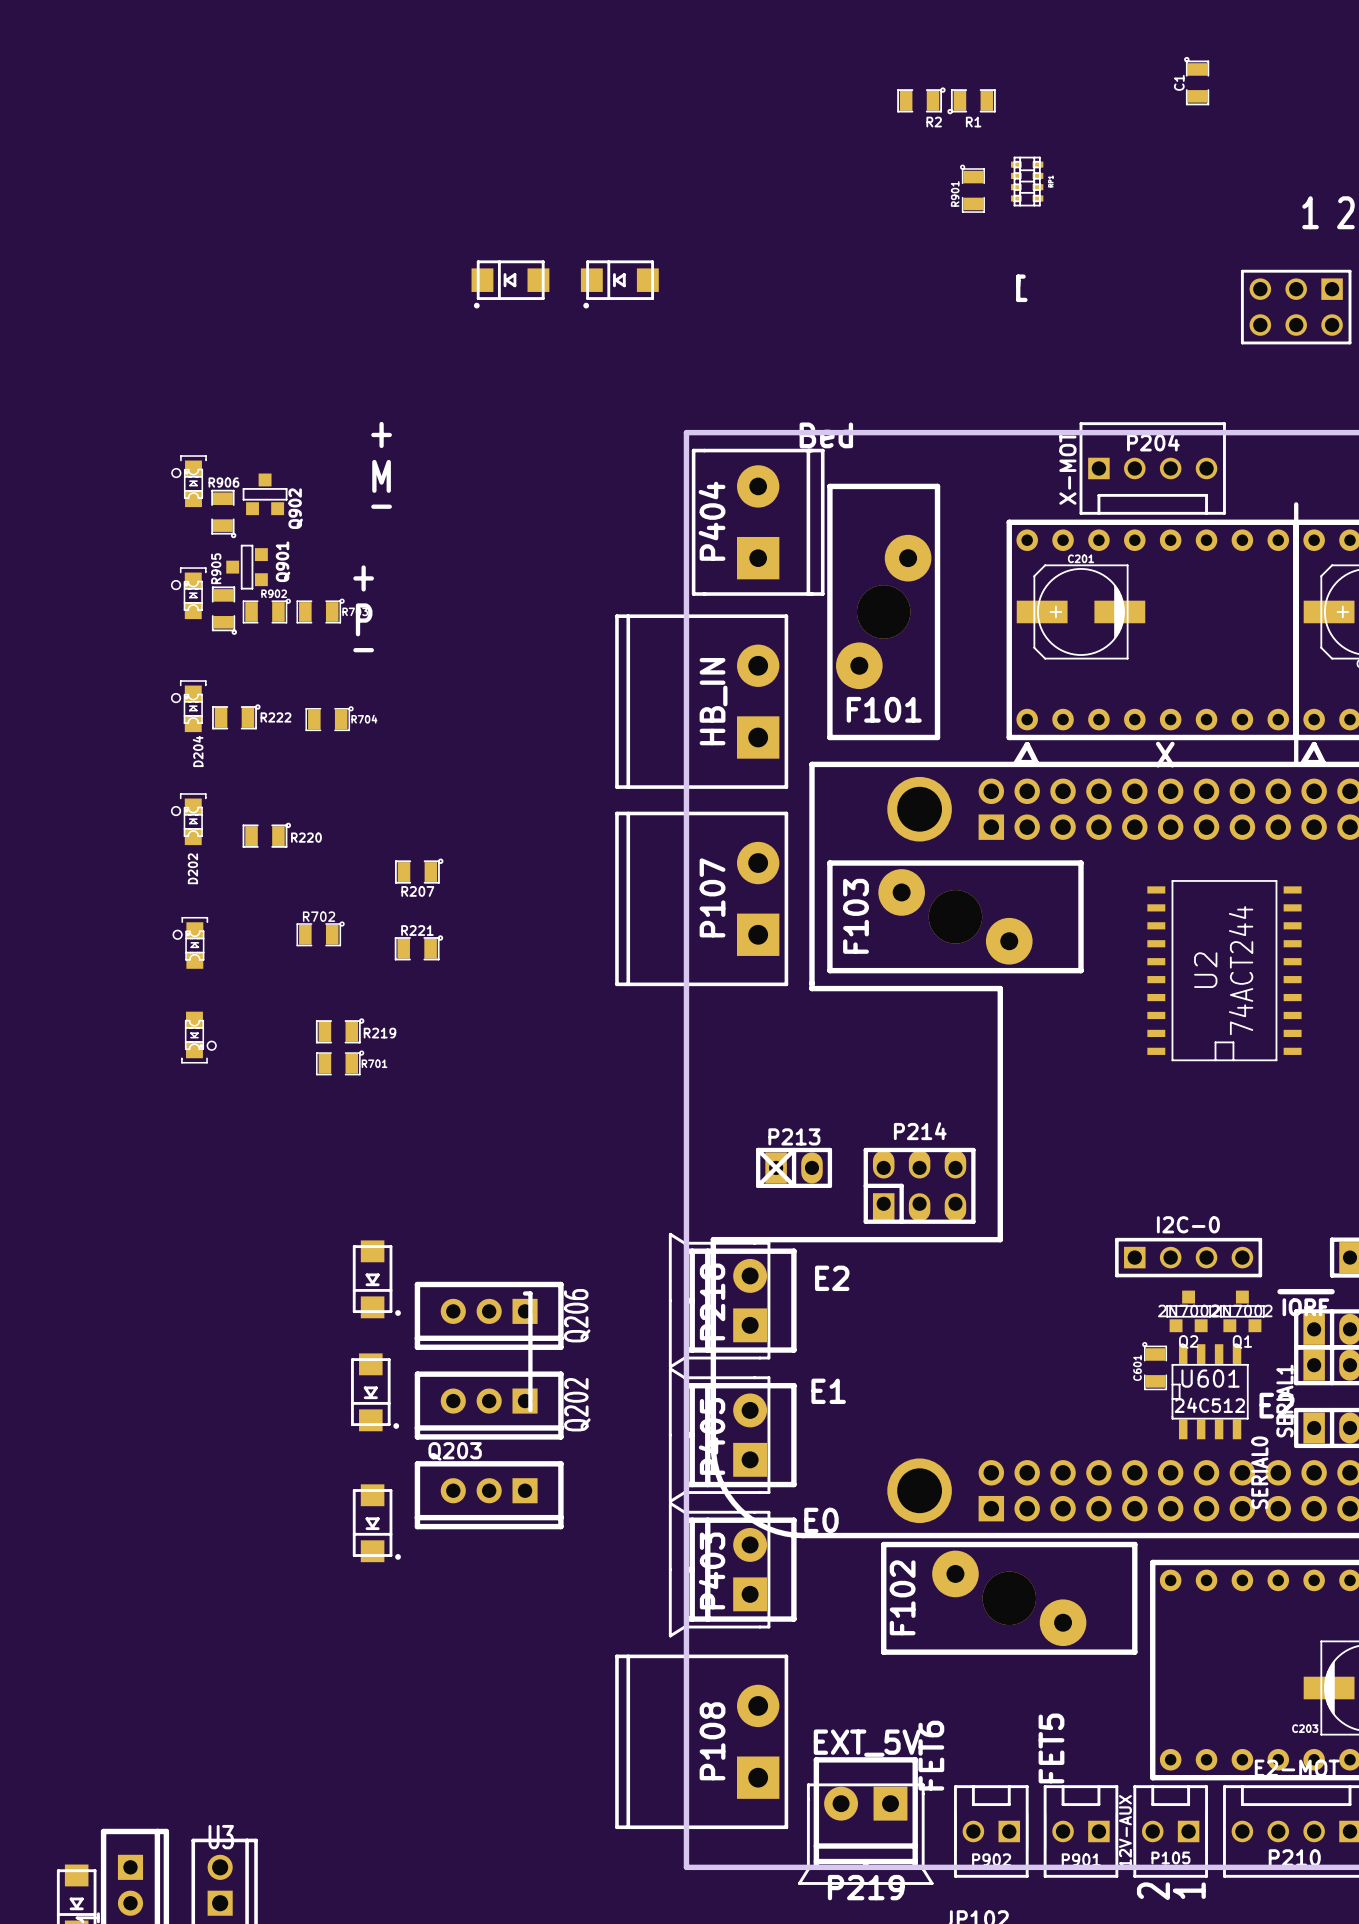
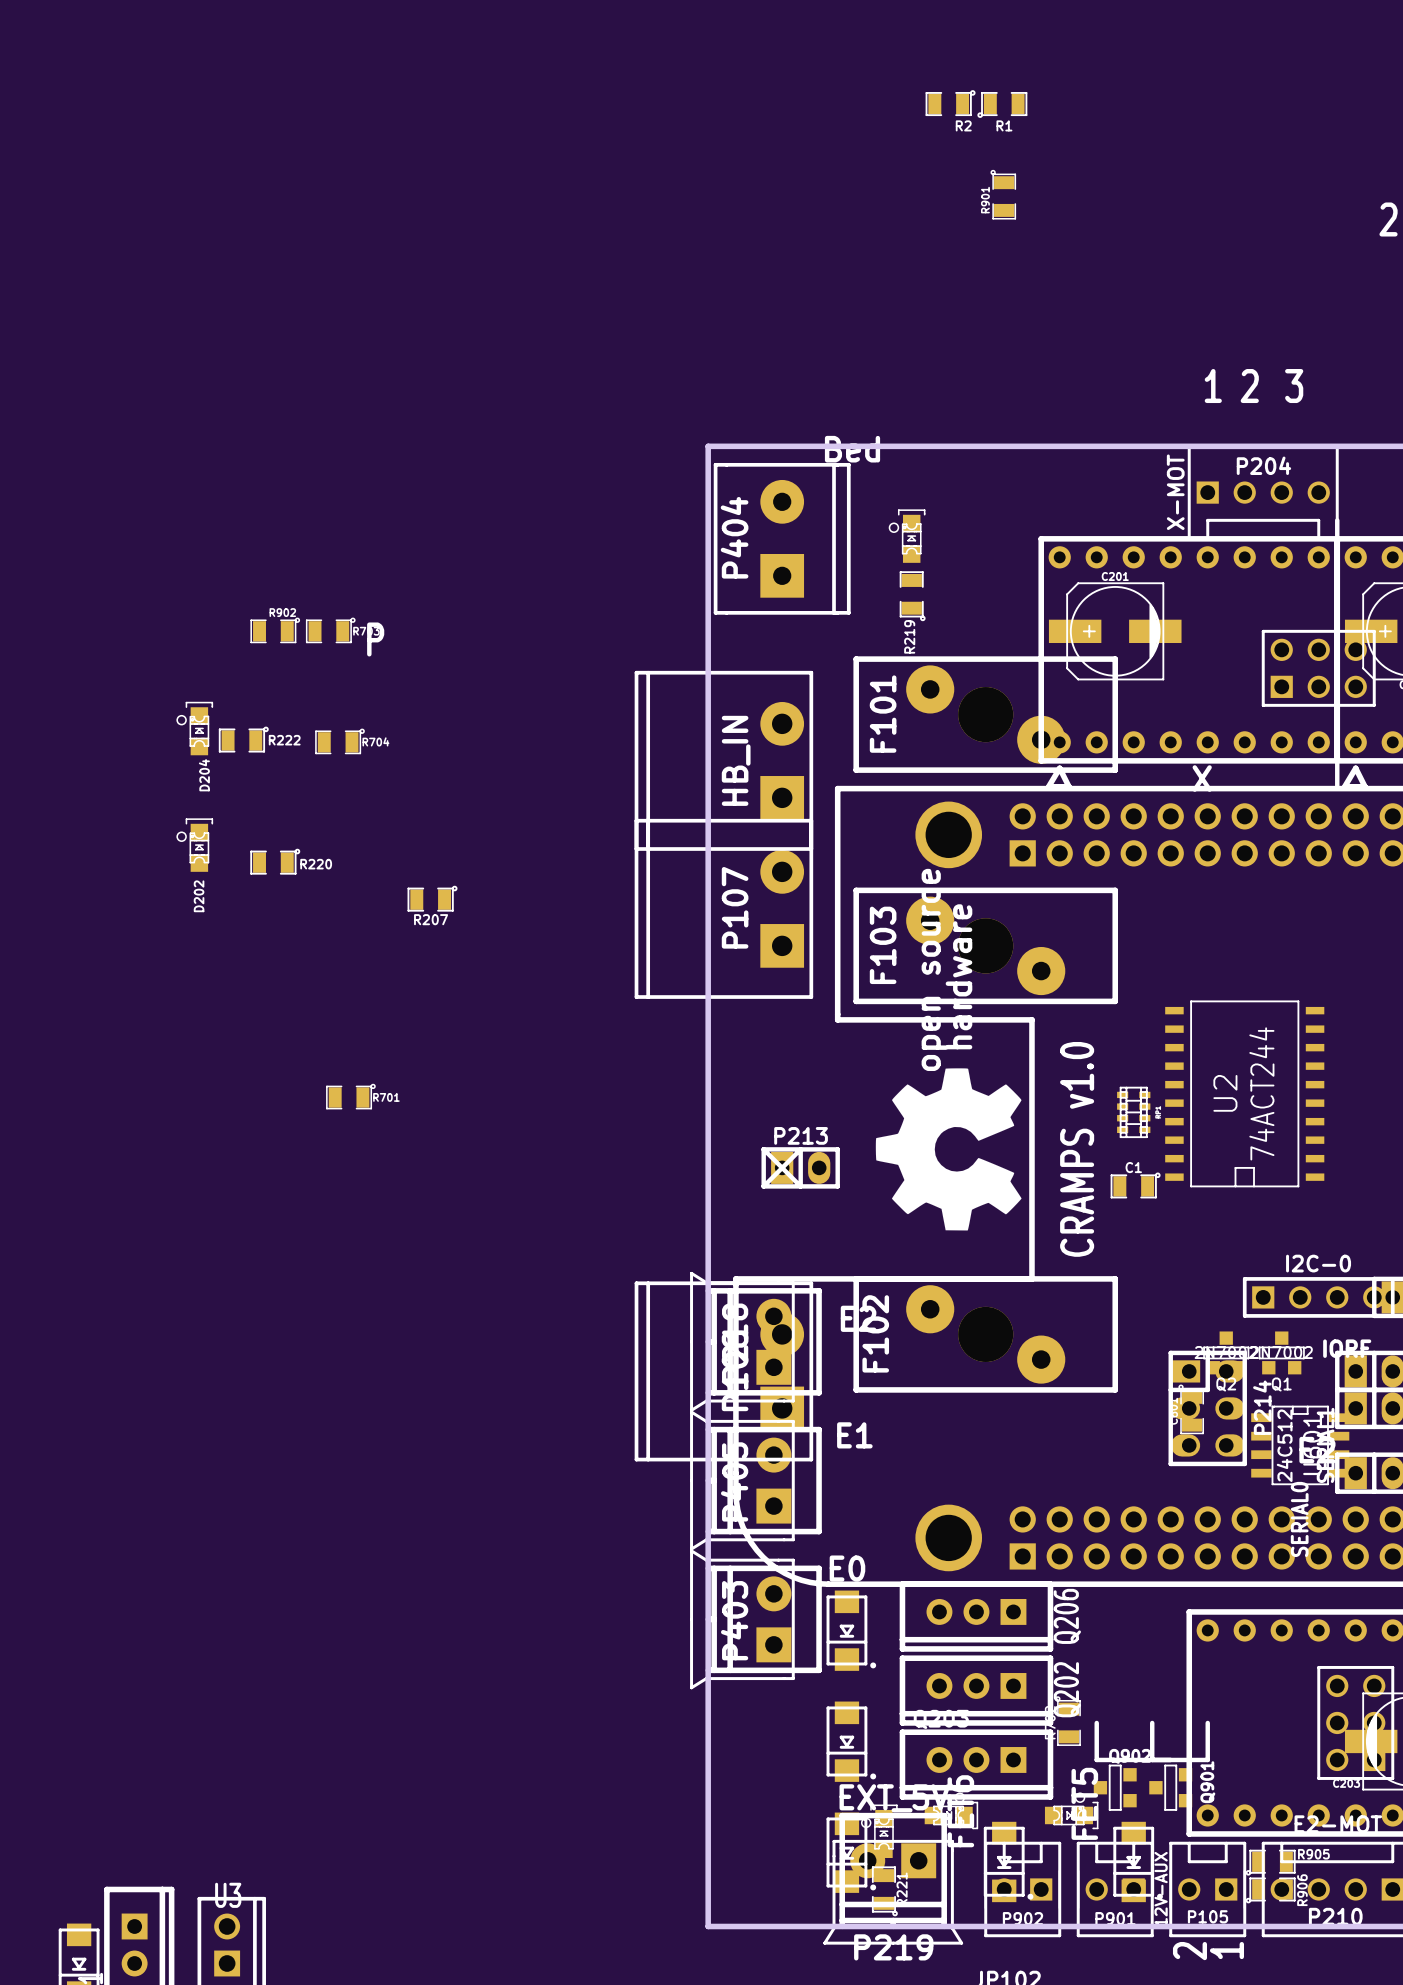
C1 rotation: 0° (1196, 81) -> 90° clockwise (1135, 1185)
C1 position: (1196, 81) -> (1135, 1185)
part position: (1027, 181) -> (1133, 1112)
text: 1 (1310, 212) -> none
line: (1023, 276) (1018, 276) (1018, 299) (1025, 299) -> none
part: (510, 284) -> none
part: (619, 284) -> none
part: (1296, 307) -> none
text: none -> 1 (1213, 386)
text: none -> 2 (1249, 386)
text: none -> 3 (1294, 386)
text: + (381, 434) -> none
P204 position: (1152, 468) -> (1263, 492)
text: M (381, 476) -> none
part: (189, 481) -> none
Q902 rotation: 0° (265, 494) -> 90° counterclockwise (1115, 1787)
Q902 position: (265, 494) -> (1115, 1787)
text: - (381, 506) -> none
R906 rotation: 0° (223, 513) -> 90° clockwise (1270, 1890)
R906 position: (223, 513) -> (1270, 1890)
part: none -> (907, 536)
Q901 position: (247, 567) -> (1170, 1787)
text: + (363, 578) -> none
part: (188, 593) -> none
R905 rotation: 0° (224, 610) -> 90° clockwise (1270, 1862)
R905 position: (224, 610) -> (1270, 1862)
F101 rotation: 0° (883, 611) -> 90° clockwise (985, 714)
part: none -> (1318, 668)
text: - (363, 650) -> none
part position: (701, 701) -> (723, 760)
P107 position: (701, 898) -> (723, 908)
R702 rotation: 0° (320, 933) -> 90° counterclockwise (1068, 1721)
R702 position: (320, 933) -> (1068, 1721)
part: (190, 942) -> none
R221 rotation: 0° (418, 947) -> 90° clockwise (884, 1891)
R221 position: (418, 947) -> (884, 1891)
U2 position: (1224, 970) -> (1244, 1093)
R219 rotation: 0° (340, 1030) -> 90° clockwise (912, 596)
R219 position: (340, 1030) -> (912, 596)
drawing: none -> [875, 1068, 1022, 1231]
part: (198, 1037) -> none
text: none -> CRAMPS v1.0 (1077, 1149)
P213 position: (794, 1167) -> (800, 1167)
P214 rotation: 0° (919, 1185) -> 90° clockwise (1207, 1408)
P214 position: (919, 1185) -> (1207, 1408)
part position: (1188, 1257) -> (1318, 1297)
part: (376, 1279) -> none
line: (1280, 1291) (1332, 1291) -> none
line: (525, 1293) (530, 1293) (530, 1410) -> none
Q206 position: (489, 1315) -> (976, 1616)
U601 rotation: 0° (1210, 1391) -> 90° clockwise (1300, 1445)
part: (375, 1392) -> none
Q202 position: (489, 1405) -> (976, 1690)
Q203 position: (489, 1495) -> (976, 1764)
part: (376, 1523) -> none
part: none -> (851, 1630)
F102 position: (1009, 1598) -> (985, 1334)
line: none -> (1096, 1722) (1096, 1759) (1207, 1759) (1207, 1722)
line: none -> (1152, 1722) (1152, 1759)
part: none -> (1355, 1722)
part: none -> (851, 1741)
P108 position: (701, 1741) -> (723, 1371)
part: none -> (951, 1810)
part: none -> (1071, 1810)
part: none -> (879, 1831)
part: none -> (851, 1852)
part: none -> (1008, 1861)
part: none -> (1138, 1861)

